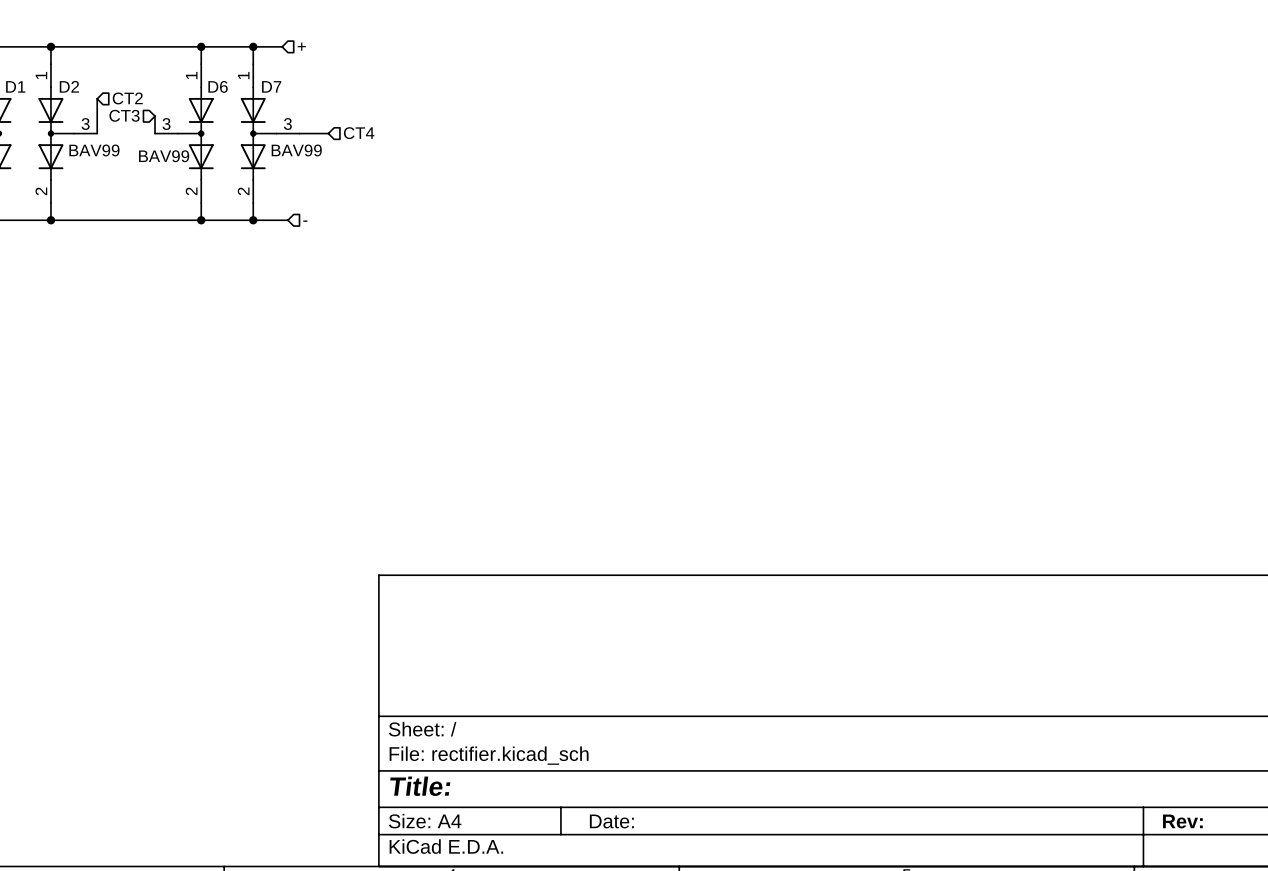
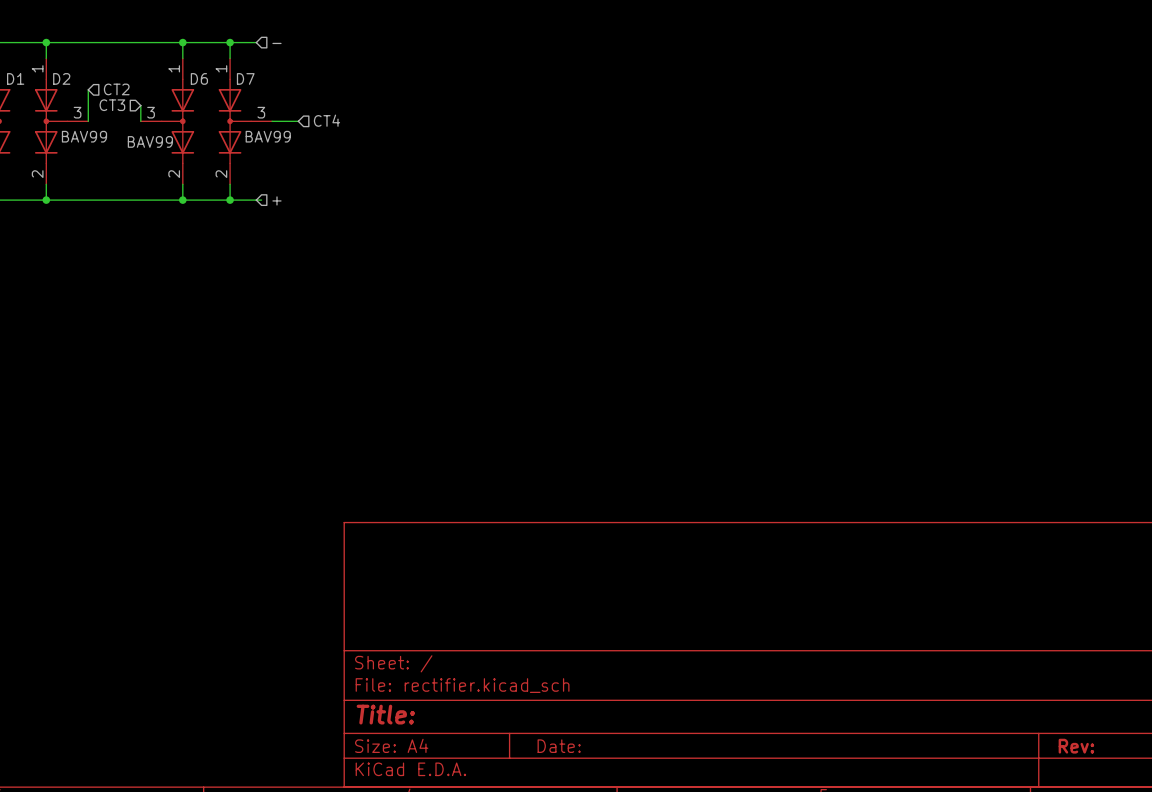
hierarchical label: + (301, 46) -> - (276, 43)
hierarchical label: - (305, 221) -> + (276, 200)

